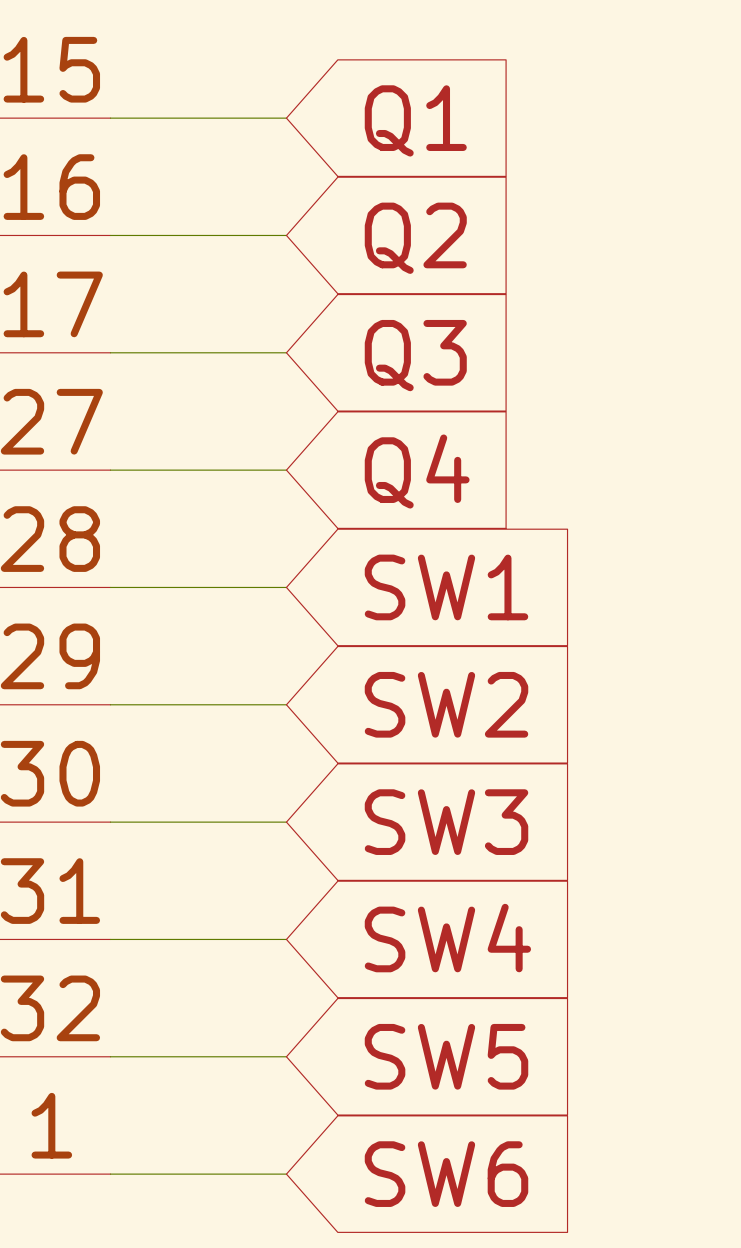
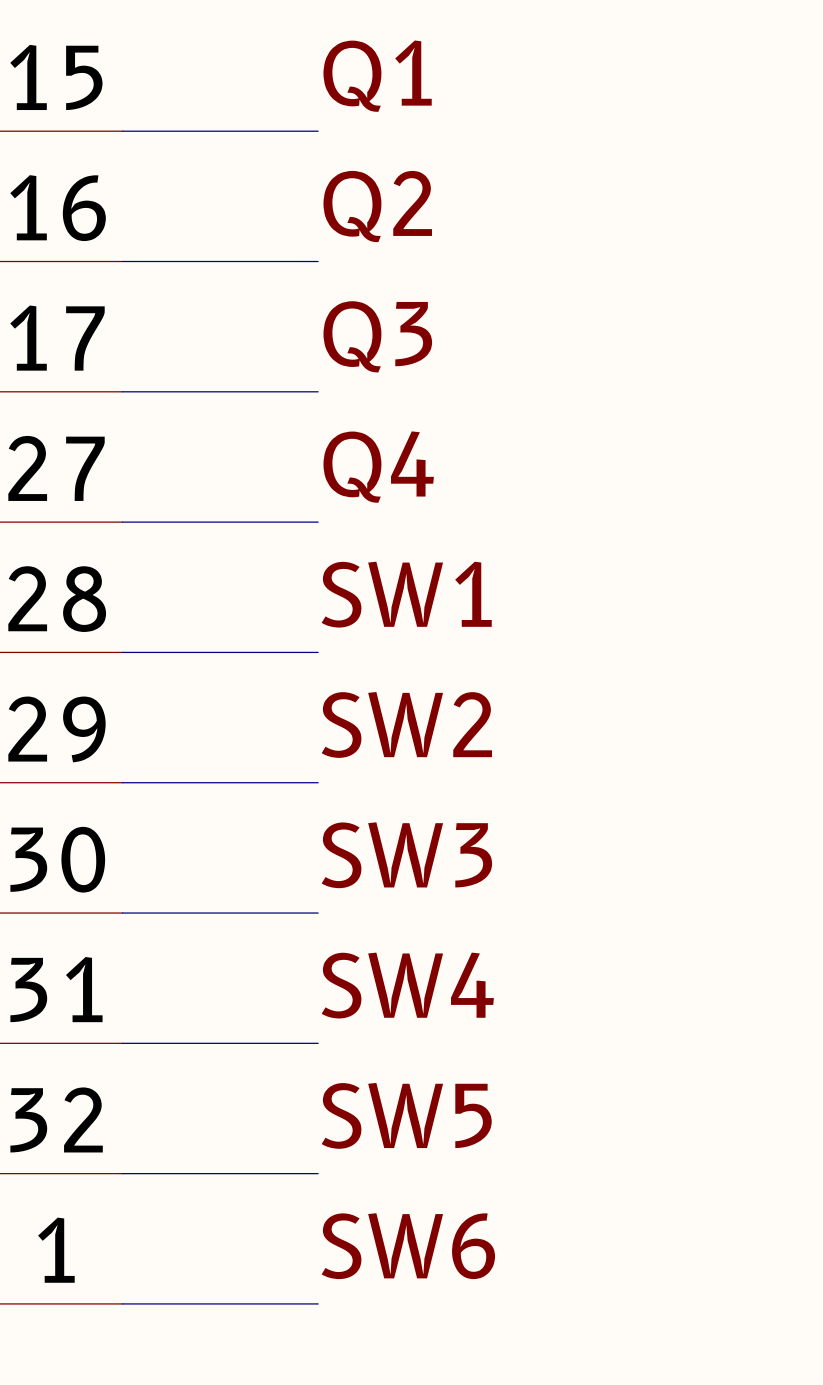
label: none -> Q1 (377, 76)
global label: Q1 (415, 120) -> none
label: none -> Q2 (377, 206)
global label: Q2 (415, 238) -> none
label: none -> Q3 (377, 336)
global label: Q3 (415, 355) -> none
label: none -> Q4 (378, 467)
global label: Q4 (417, 471) -> none
label: none -> SW1 (406, 594)
global label: SW1 (446, 587) -> none
label: none -> SW2 (406, 724)
global label: SW2 (446, 704) -> none
label: none -> SW3 (406, 855)
global label: SW3 (446, 822) -> none
label: none -> SW4 (407, 985)
global label: SW4 (447, 938) -> none
label: none -> SW5 (406, 1115)
global label: SW5 (446, 1056) -> none
label: none -> SW6 (408, 1246)
global label: SW6 (446, 1174) -> none

